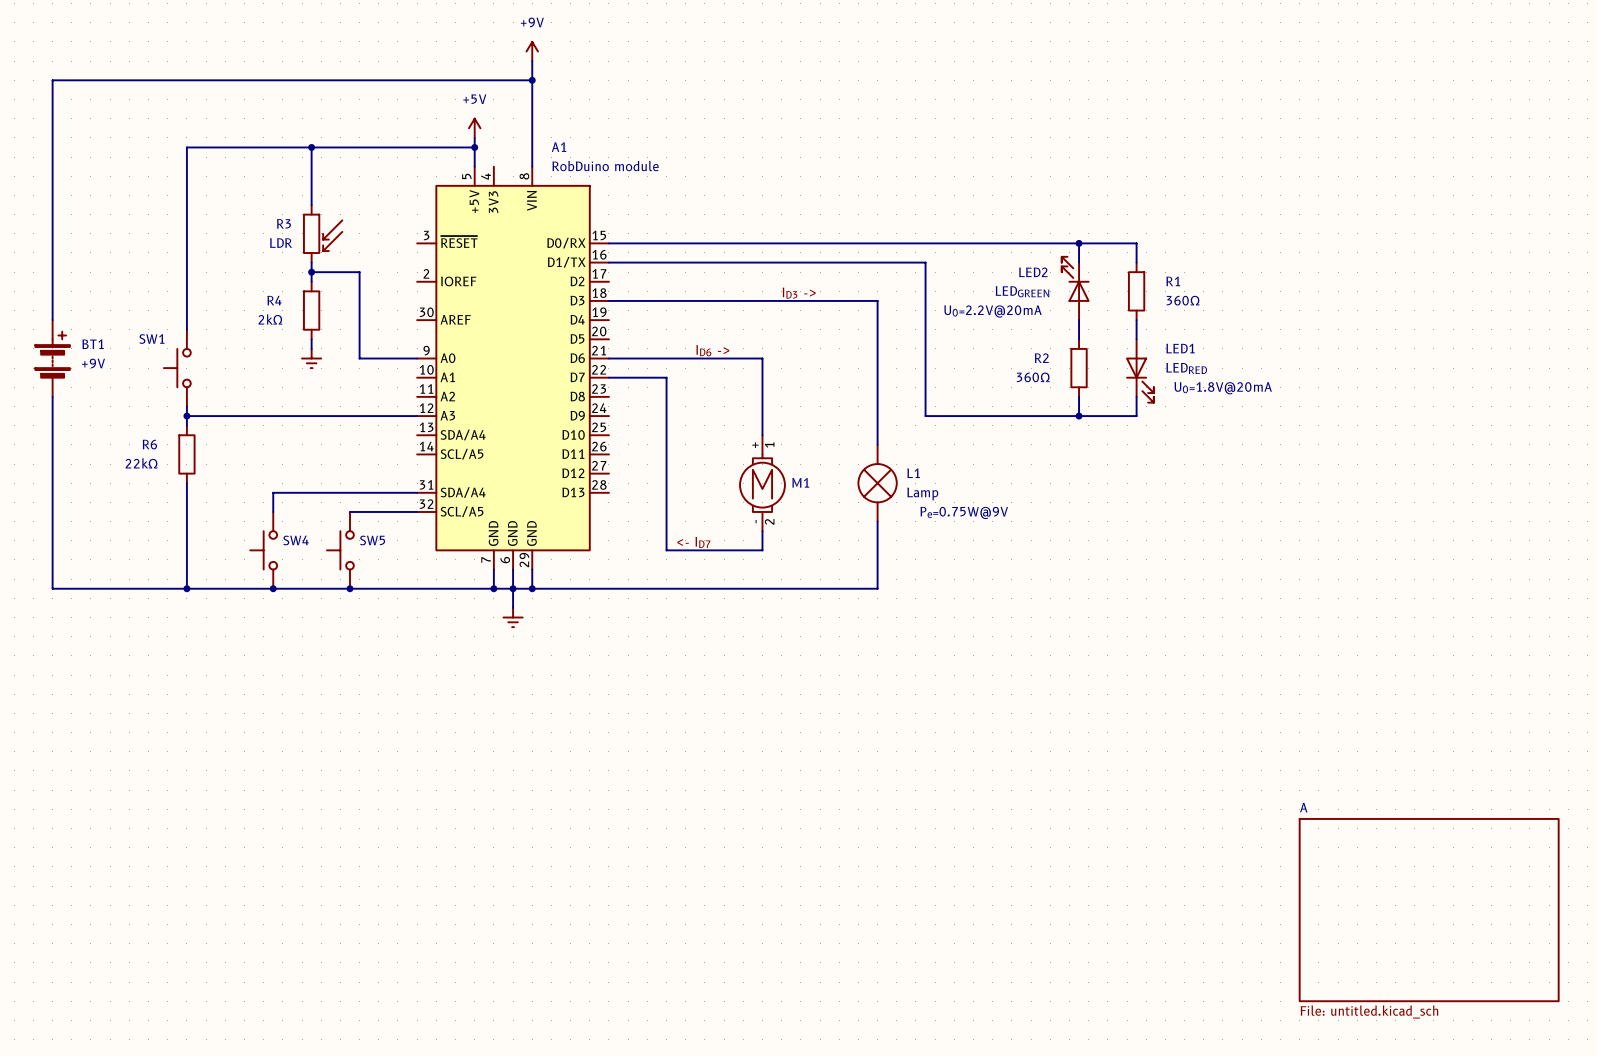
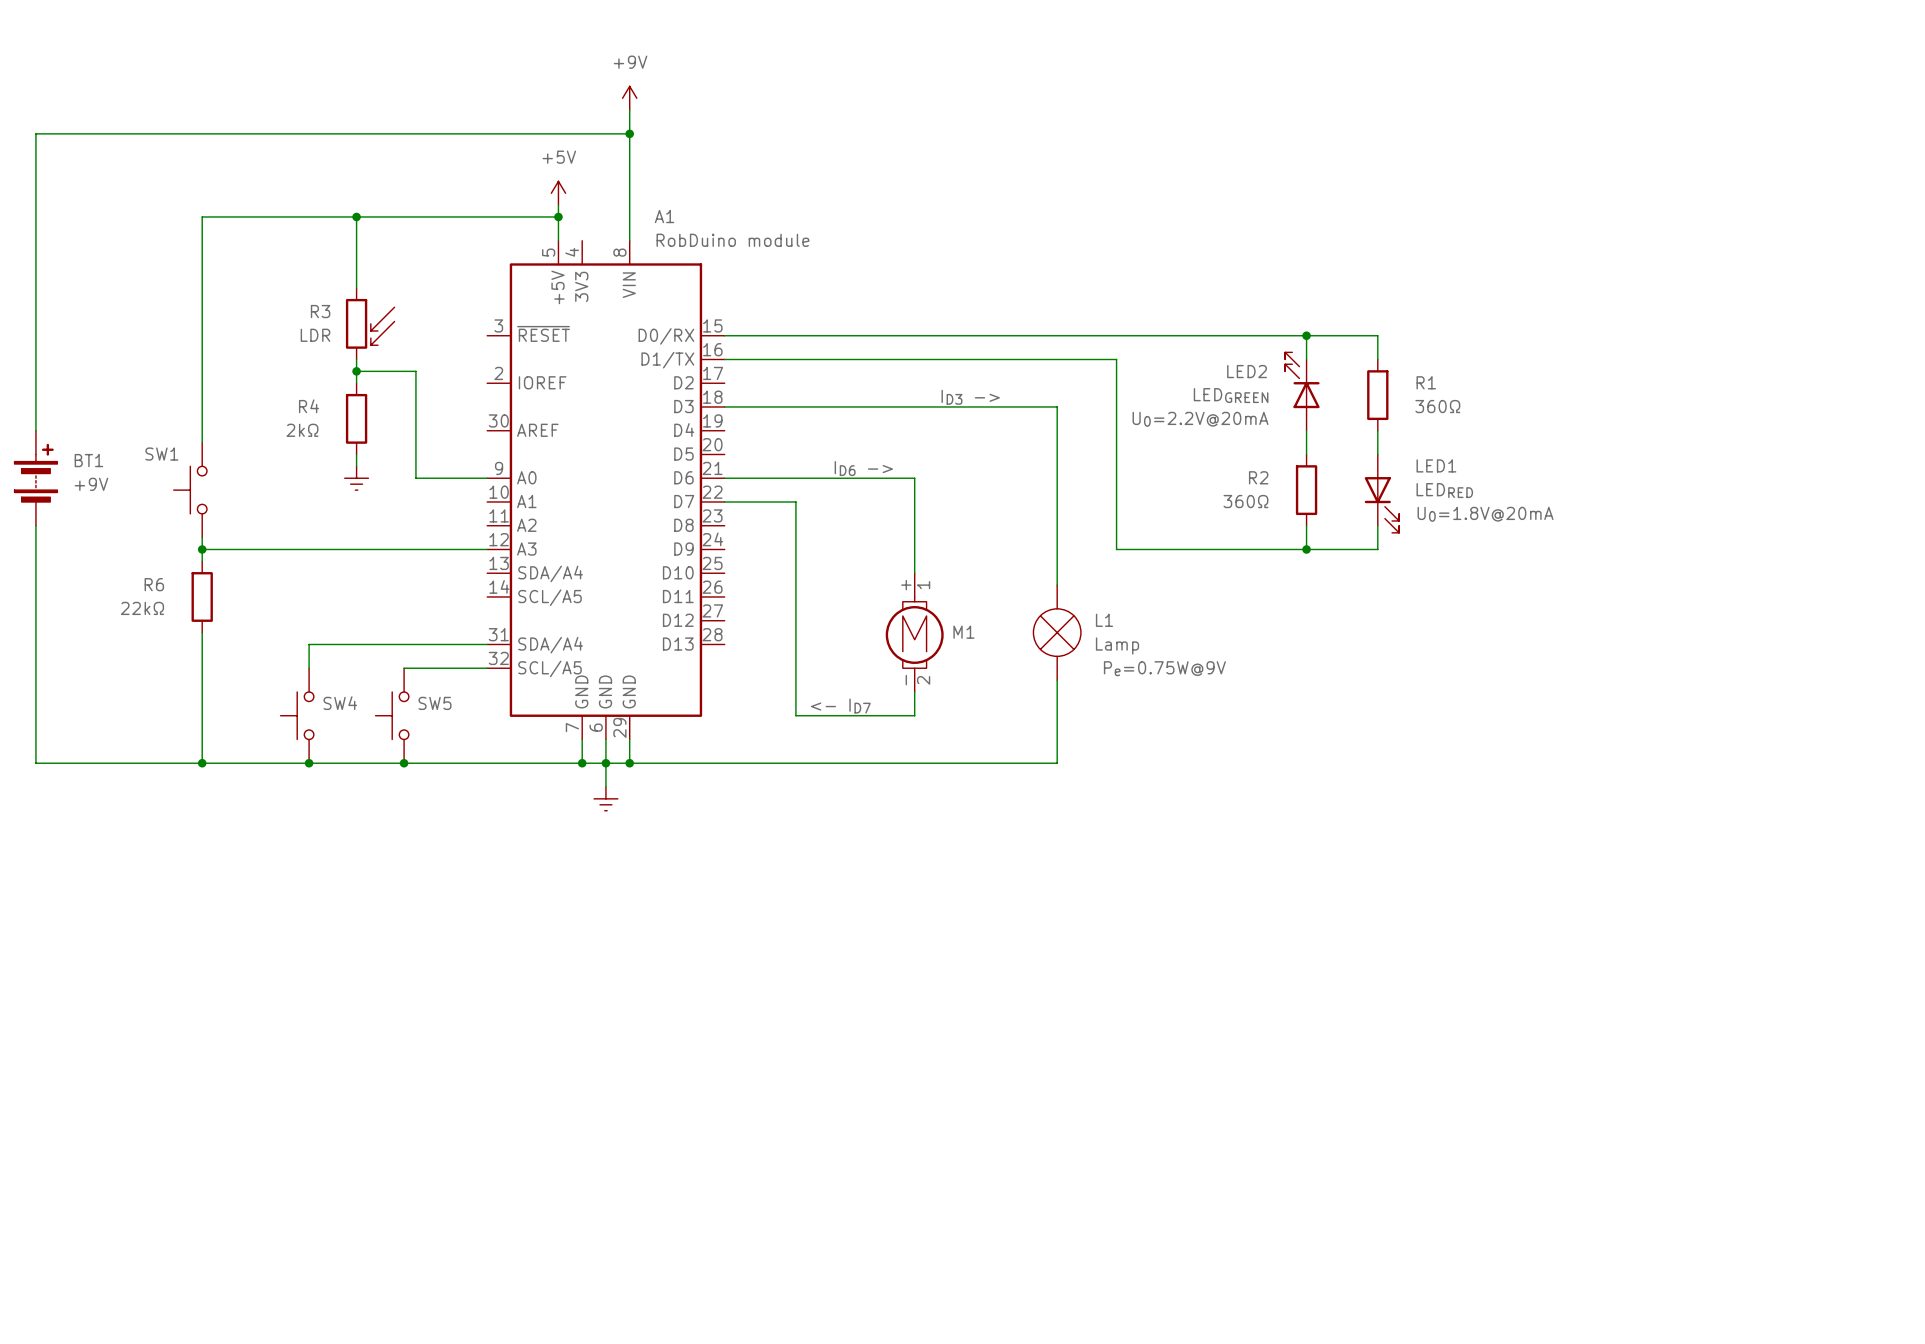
sheet A: File: untitled.kicad_sch (1429, 910) -> none

